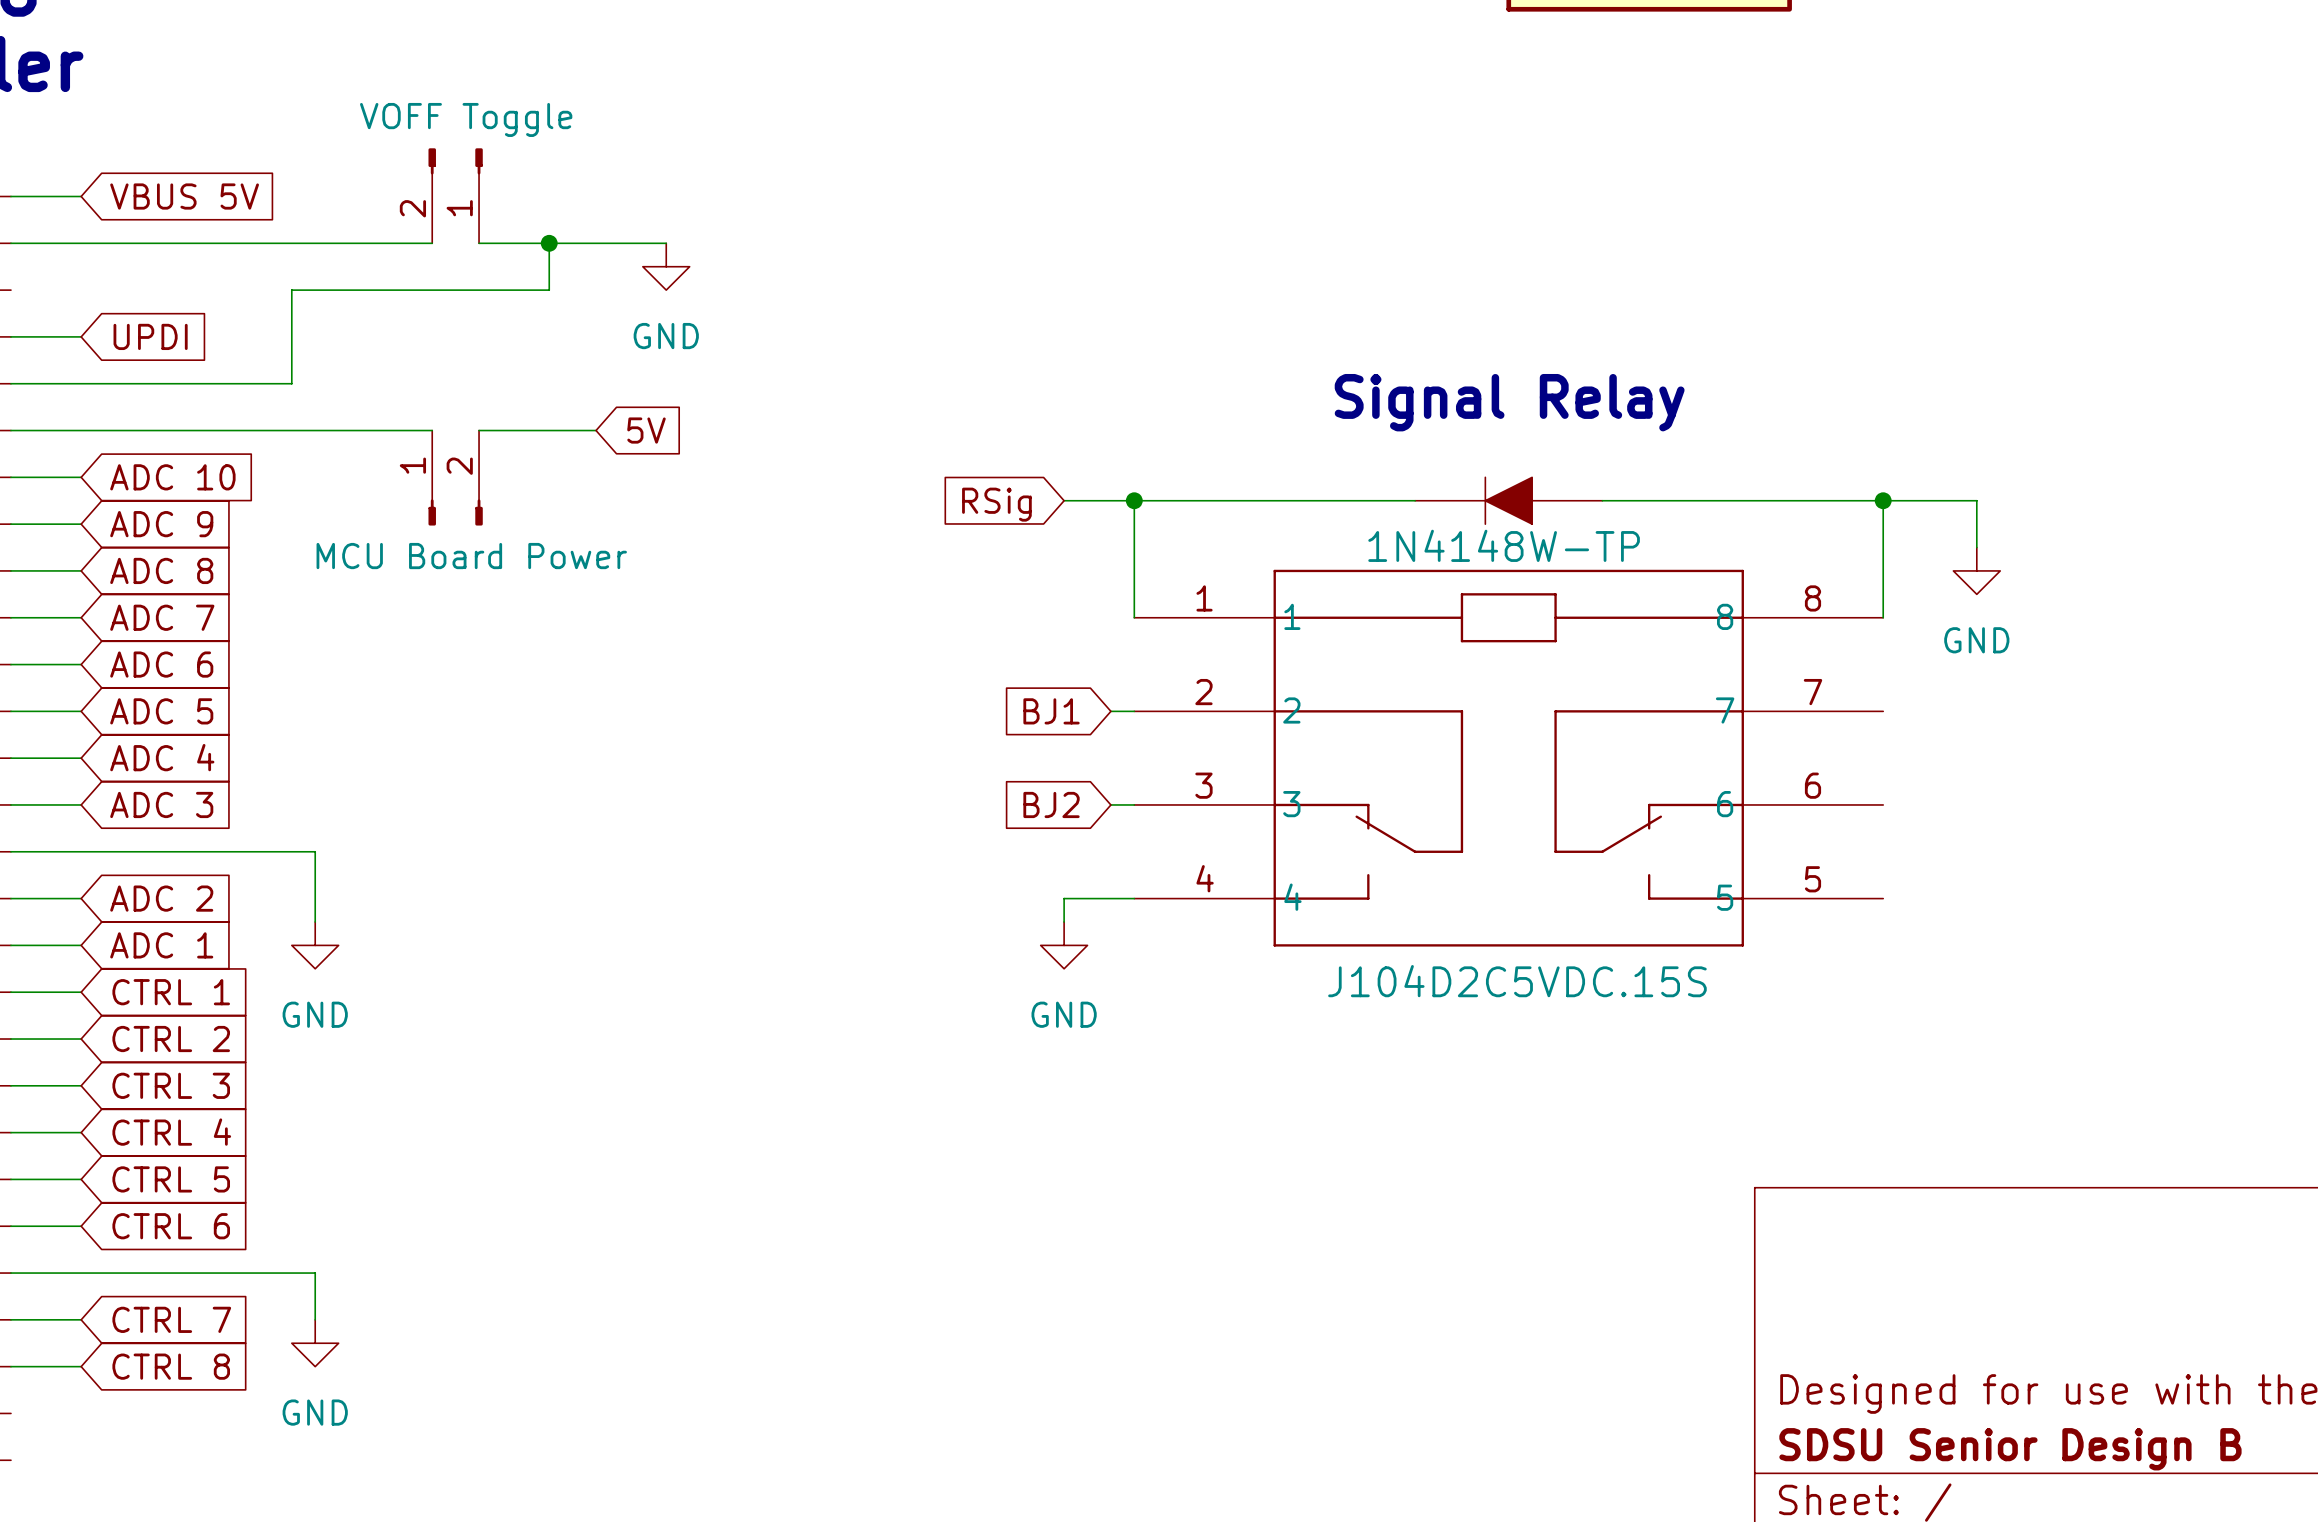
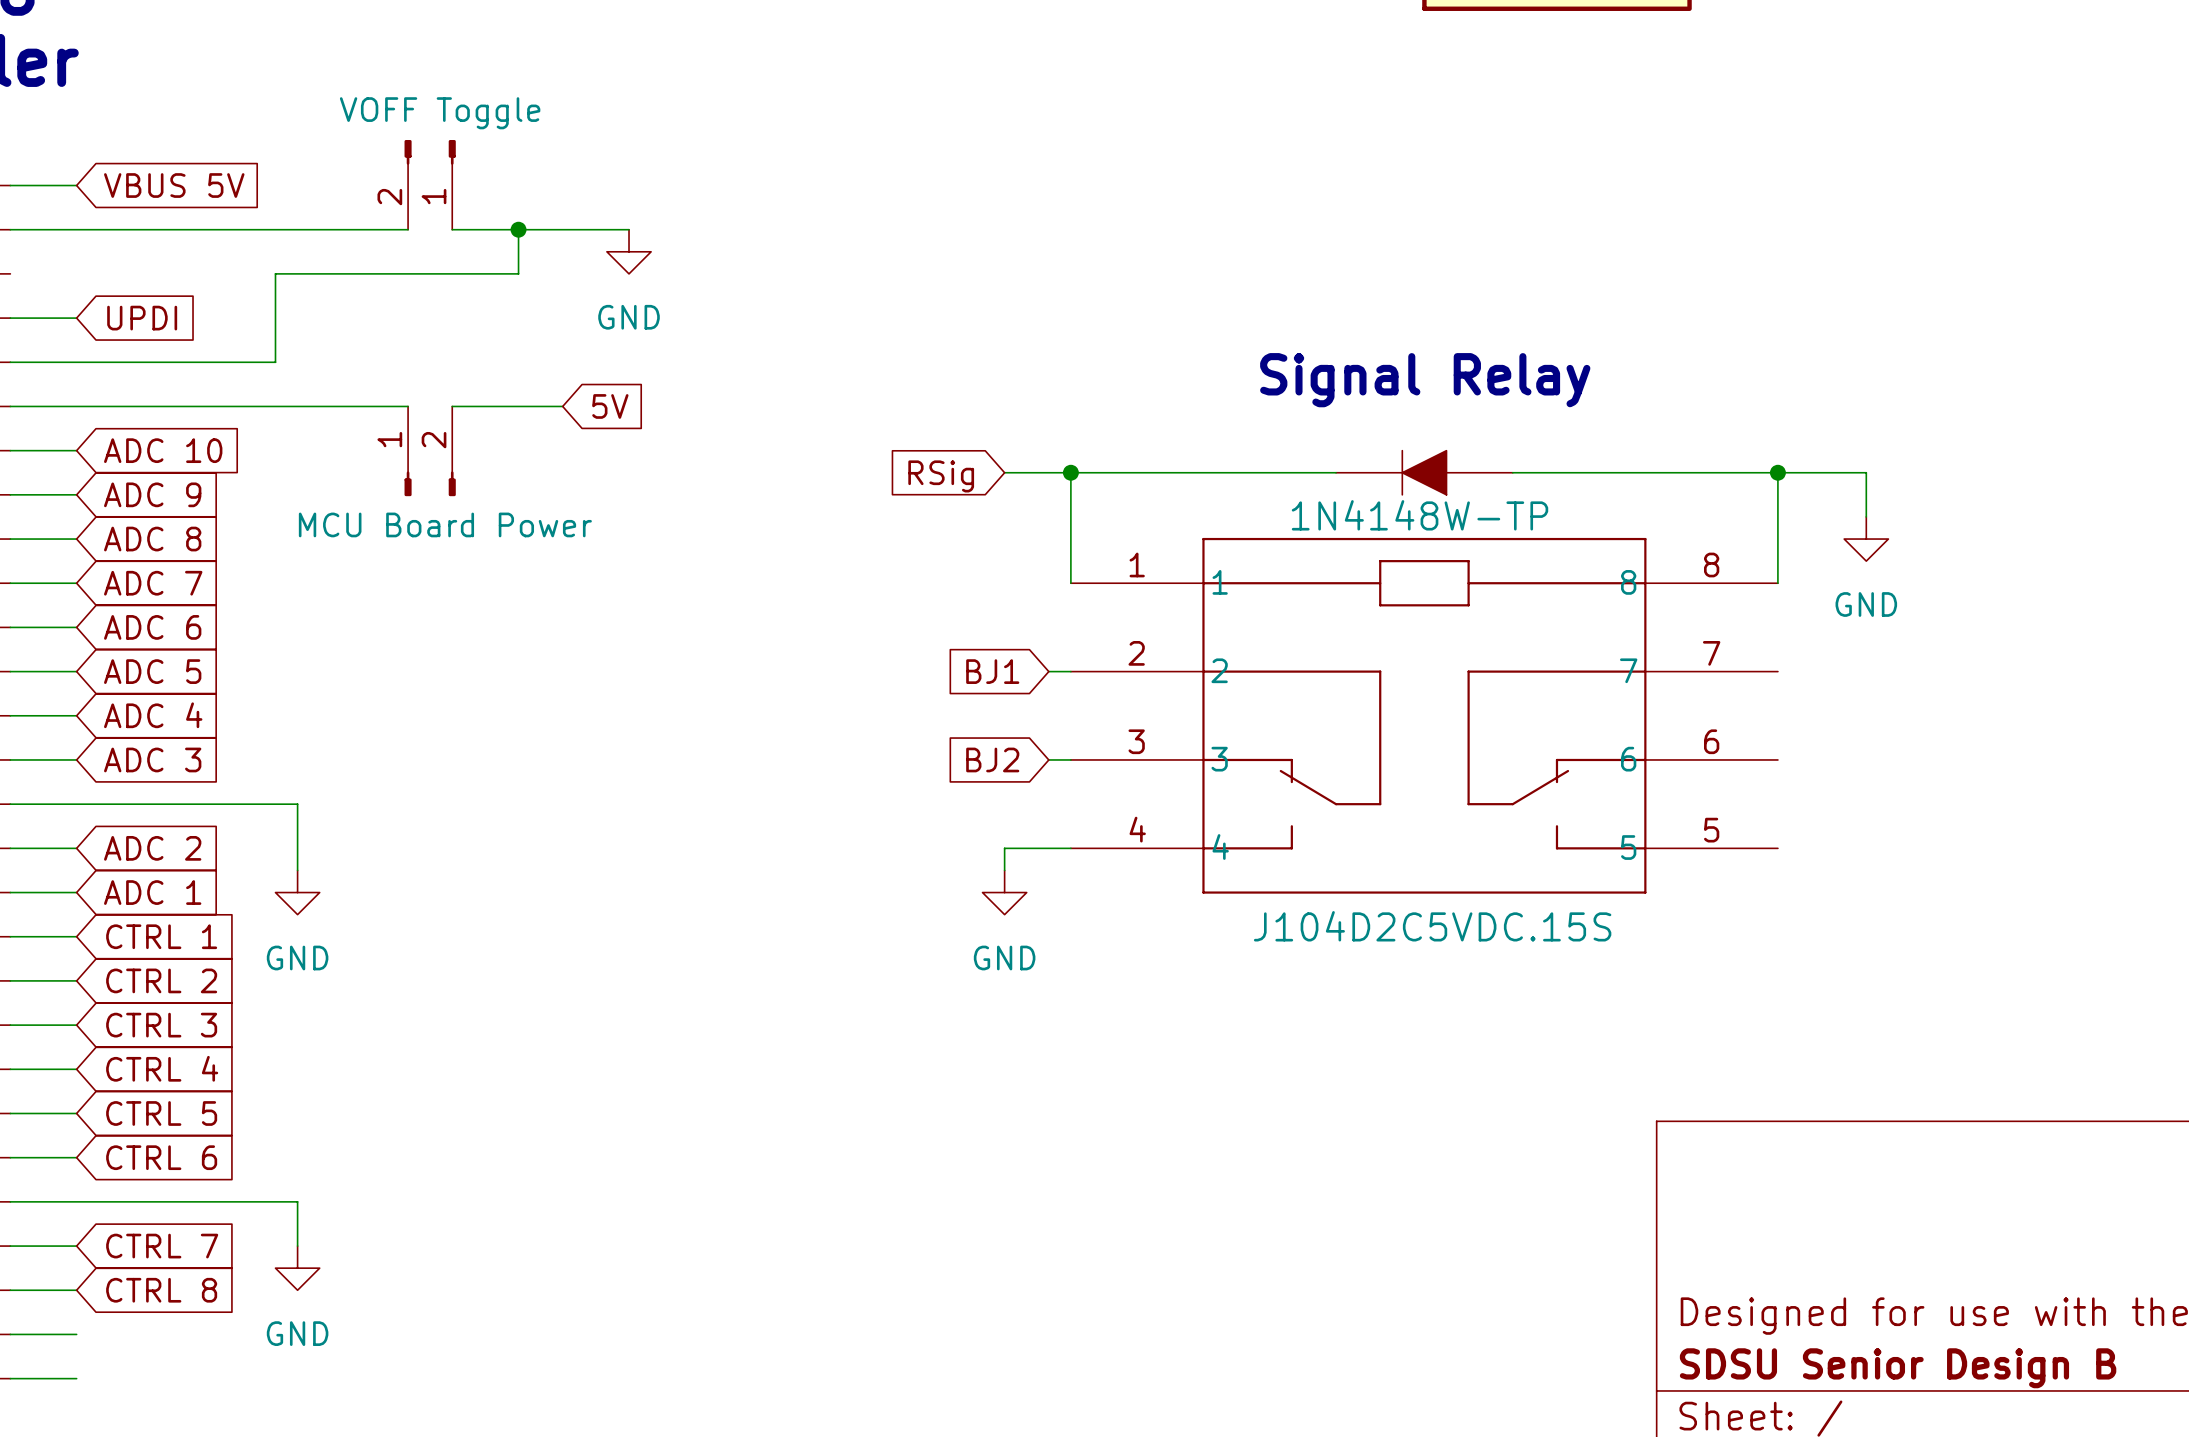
wire: none -> (10, 1334) (76, 1334)
wire: none -> (10, 1378) (76, 1378)

